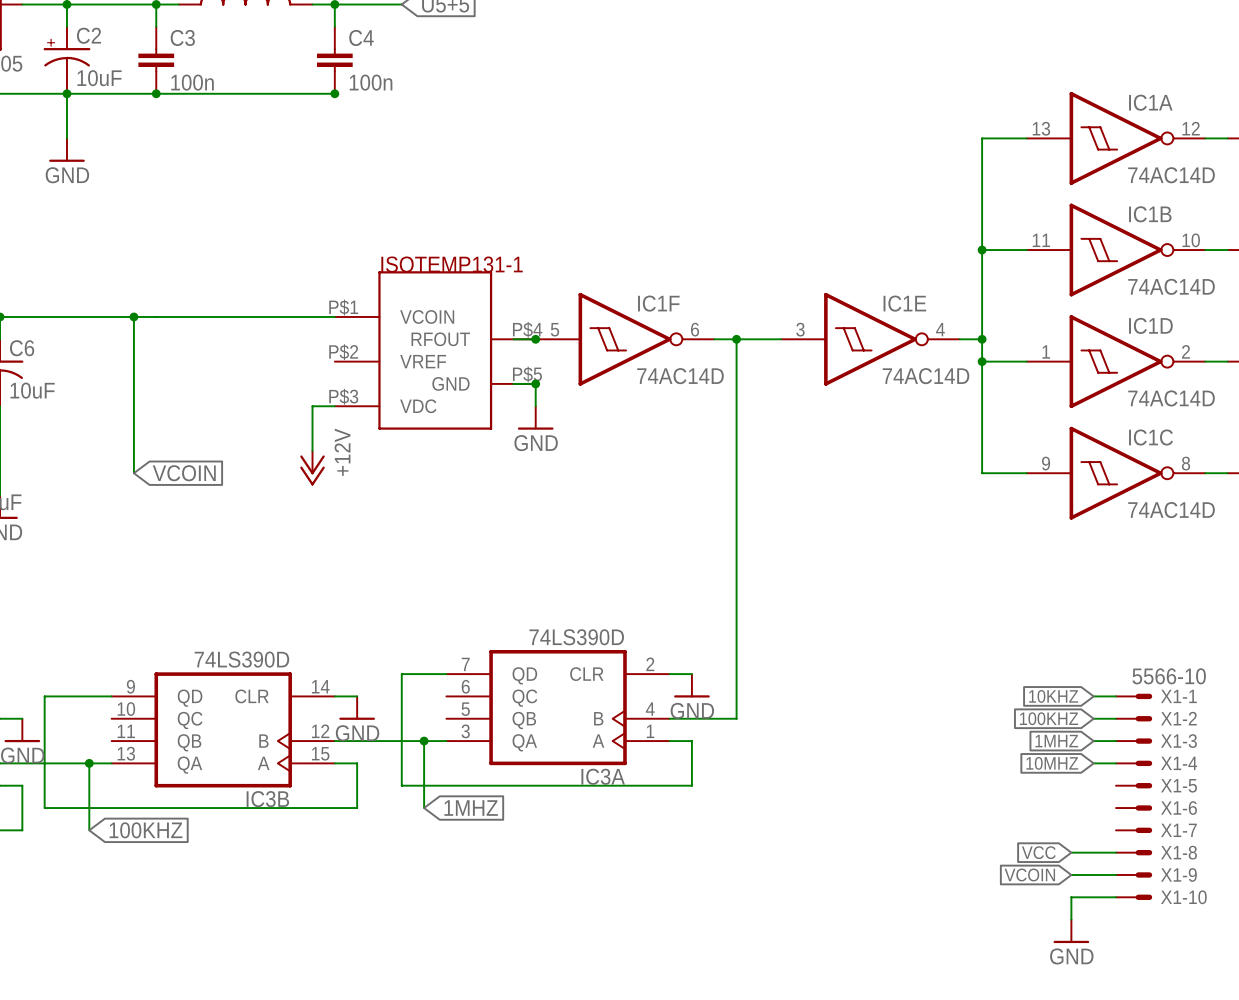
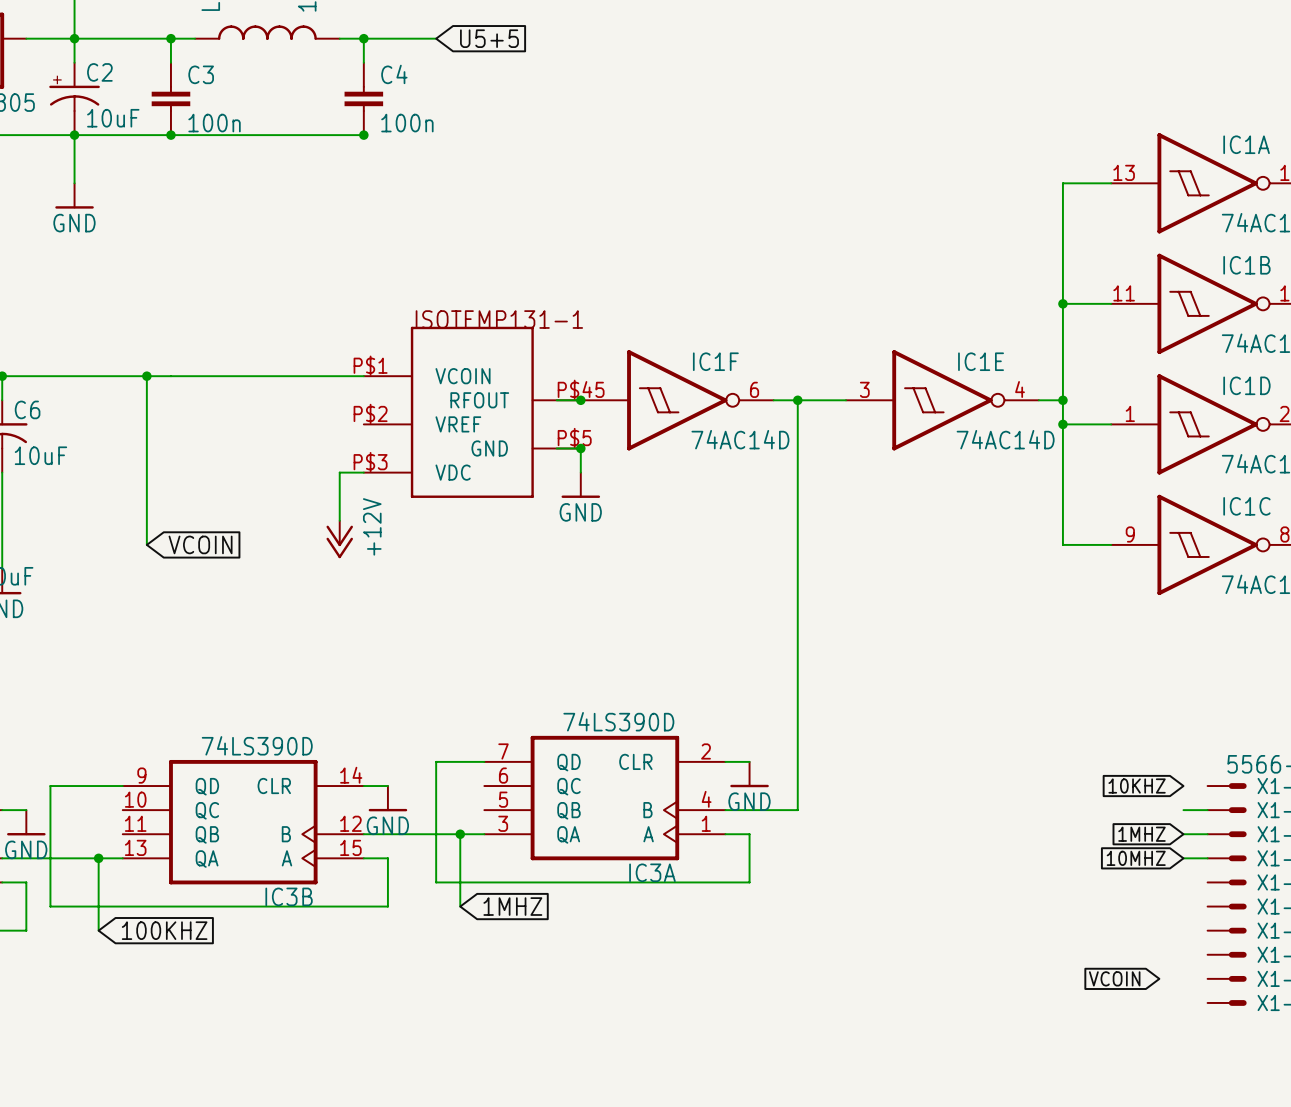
wire: (1093, 696) (1116, 696) -> none
global label: 100KHZ (1049, 718) -> none
global label: VCC (1038, 852) -> none
wire: (1071, 852) (1116, 852) -> none
wire: (1071, 874) (1116, 874) -> none
wire: (1116, 897) (1071, 897) (1071, 919) -> none
power symbol: GND (1071, 931) -> none

